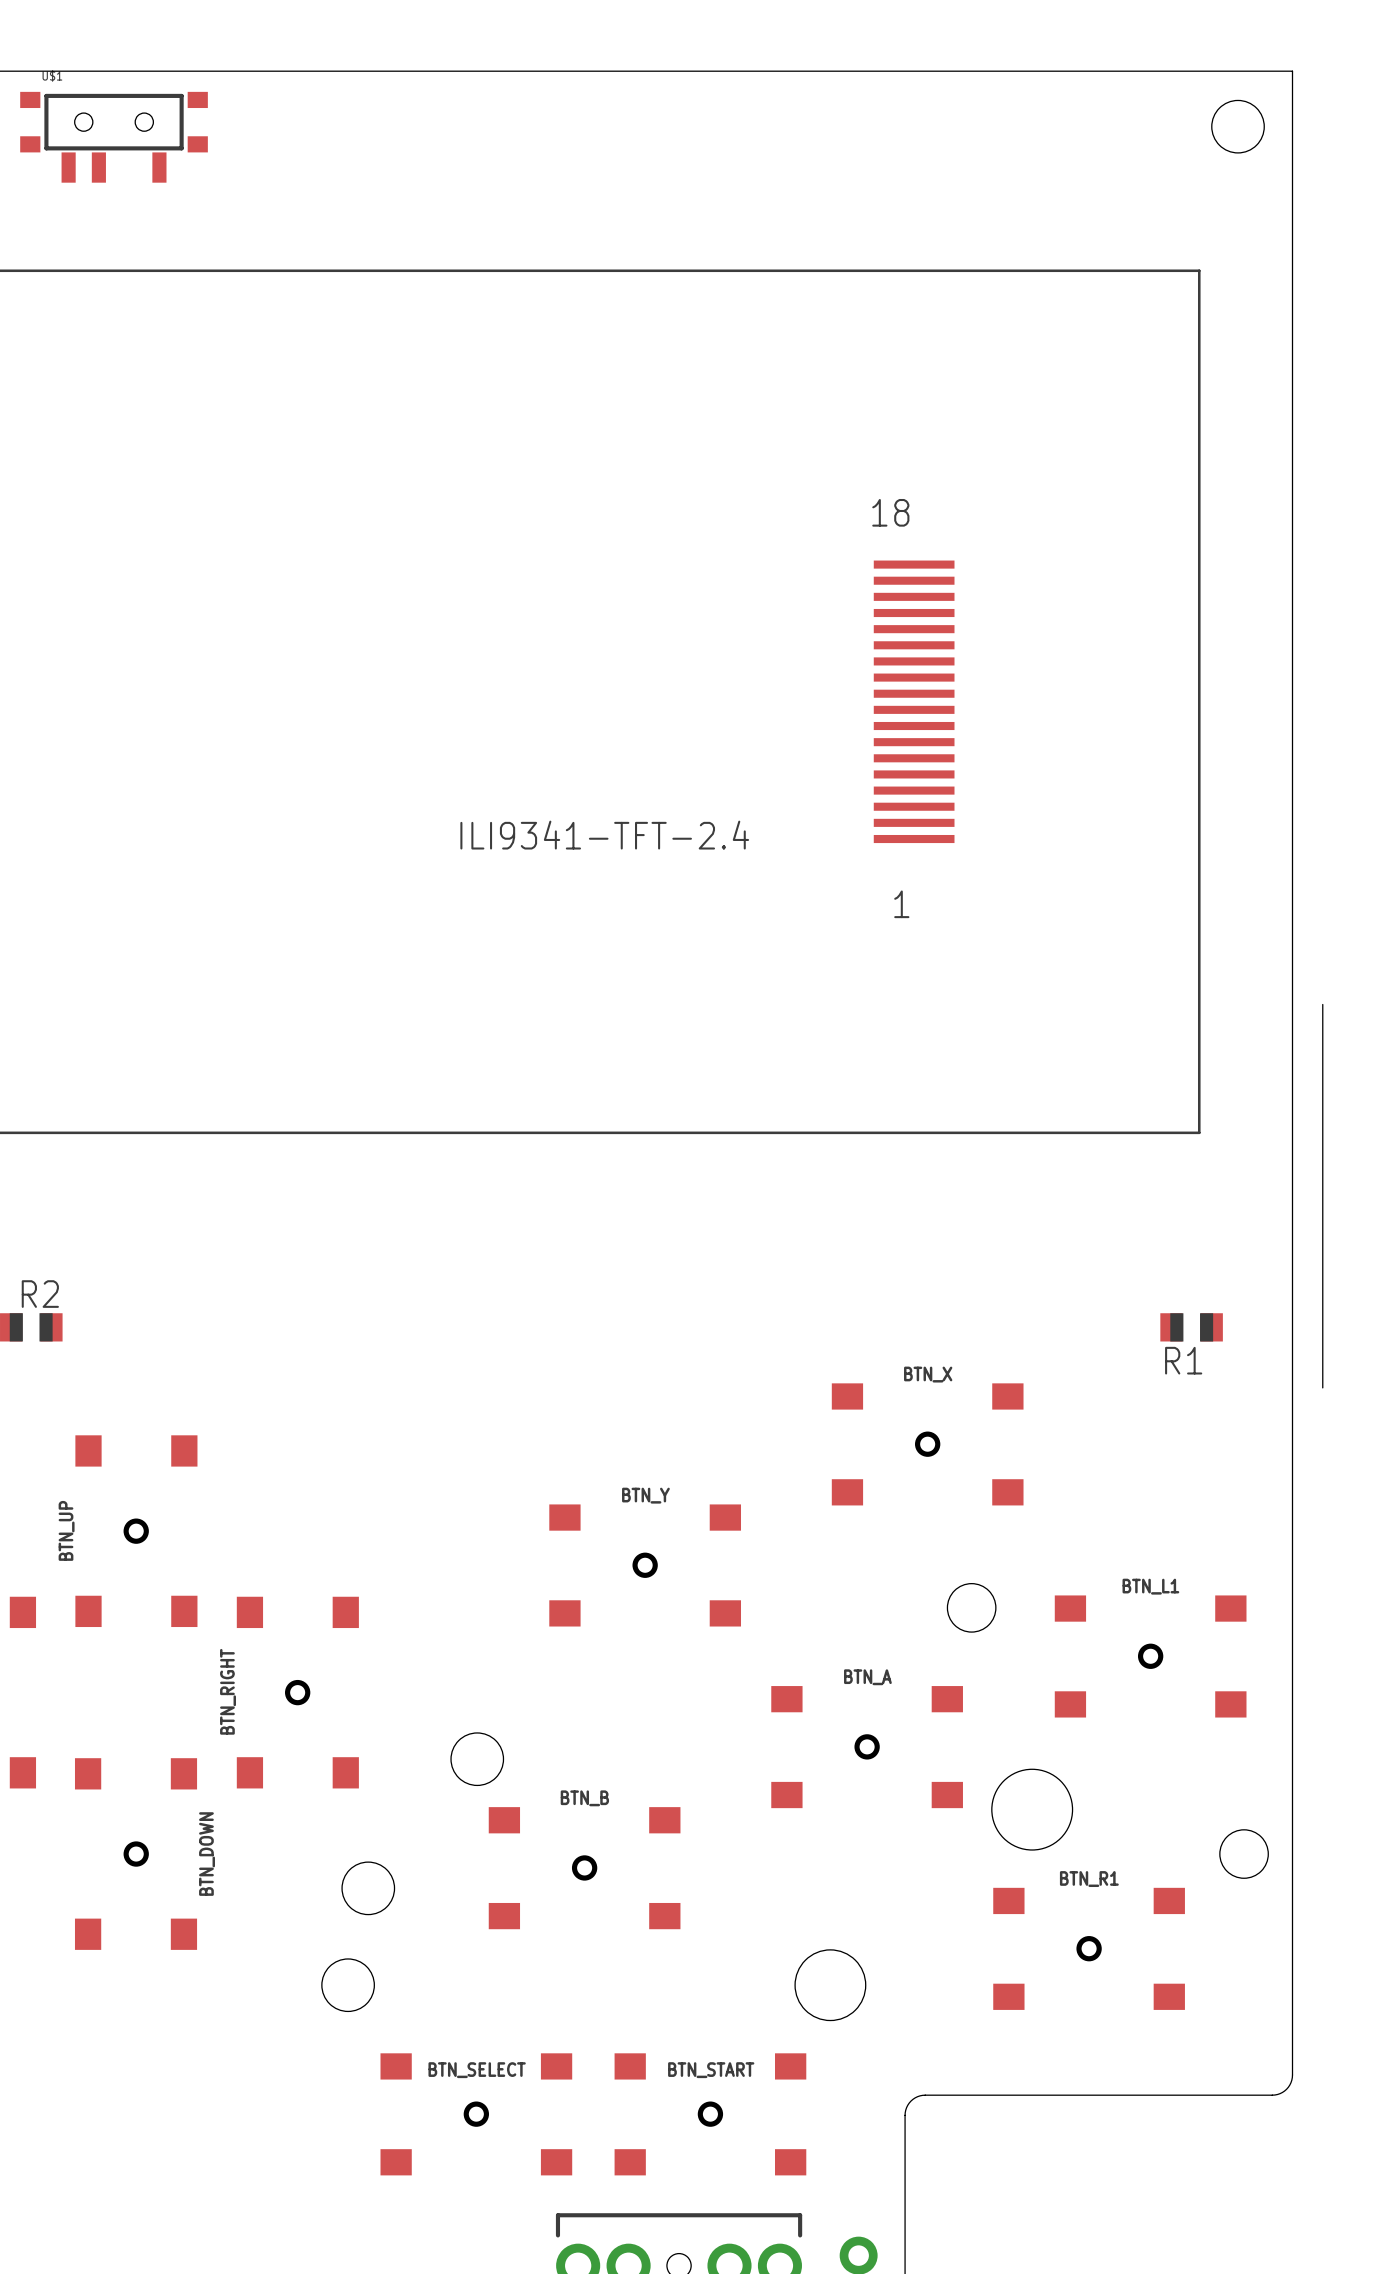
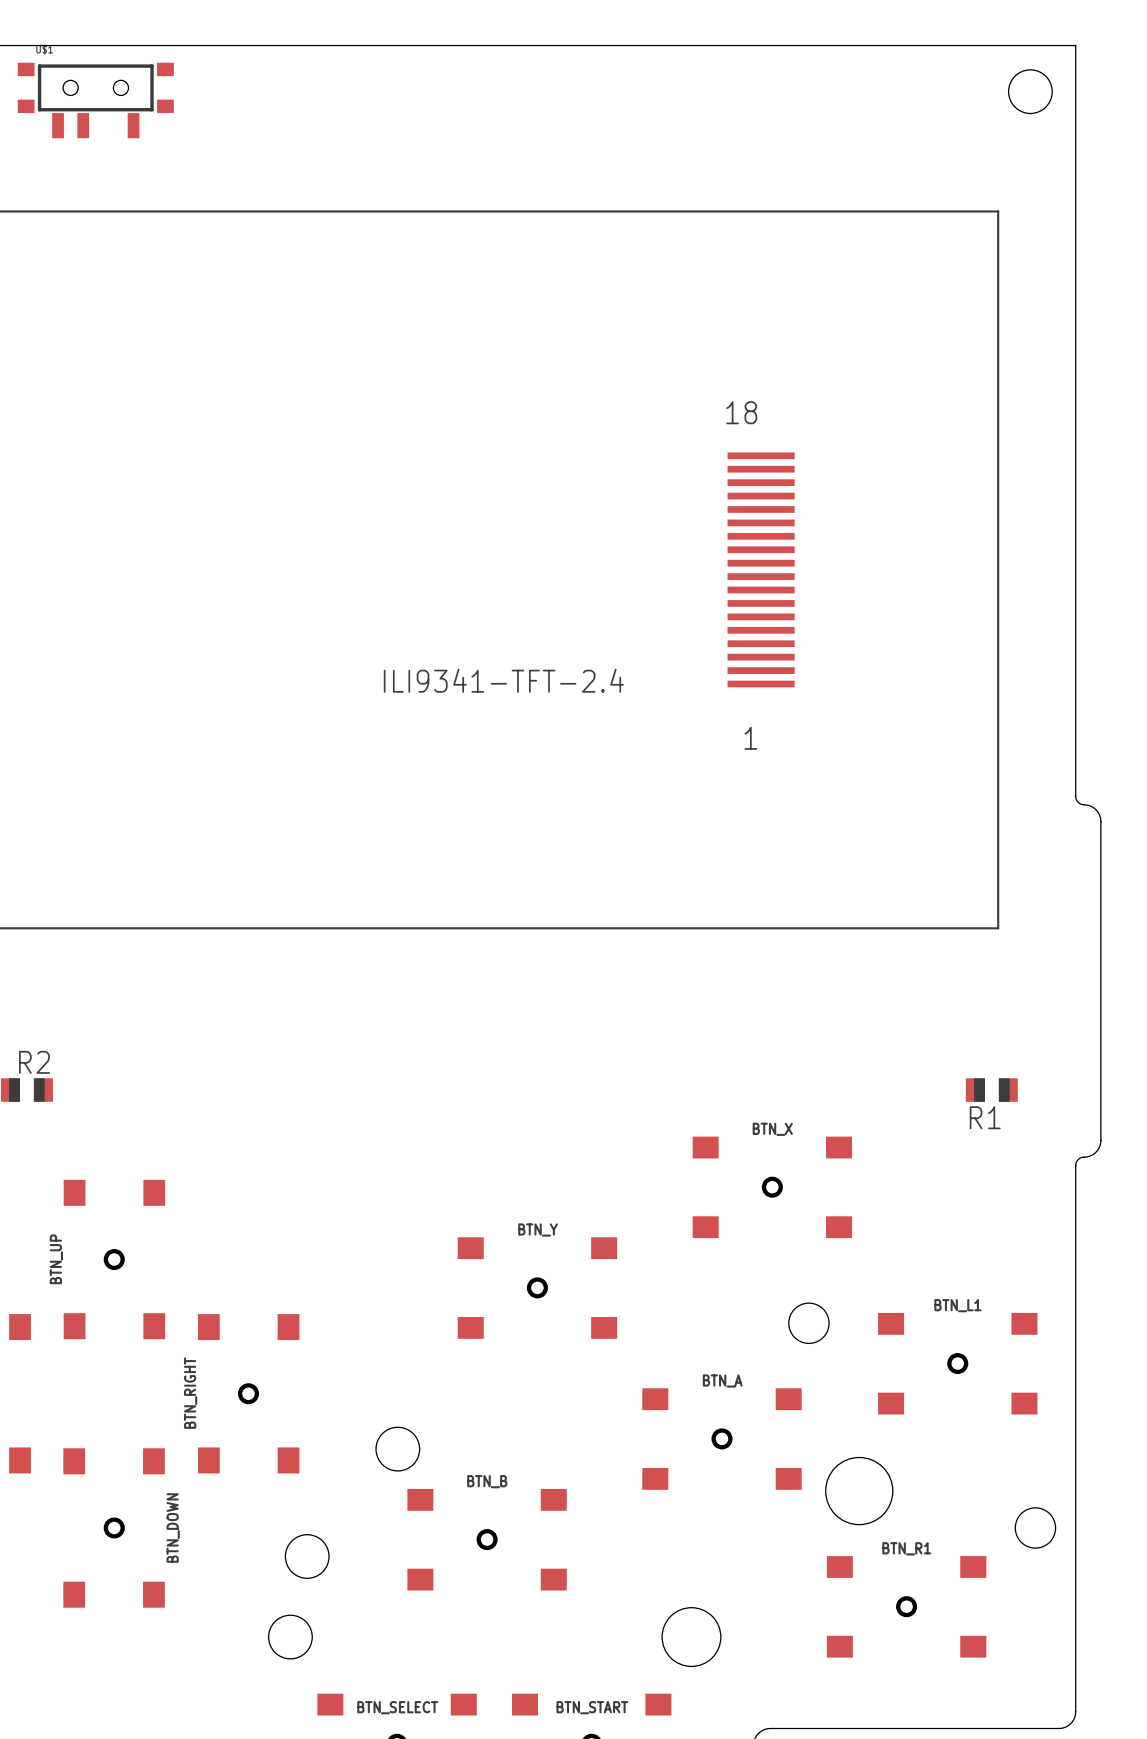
board edge: (1292, 974) (1292, 1418) -> (1075, 796) (1079, 803) (1095, 809) (1100, 821)
board edge: none -> (1100, 1140) (1095, 1152) (1079, 1158) (1075, 1165)

